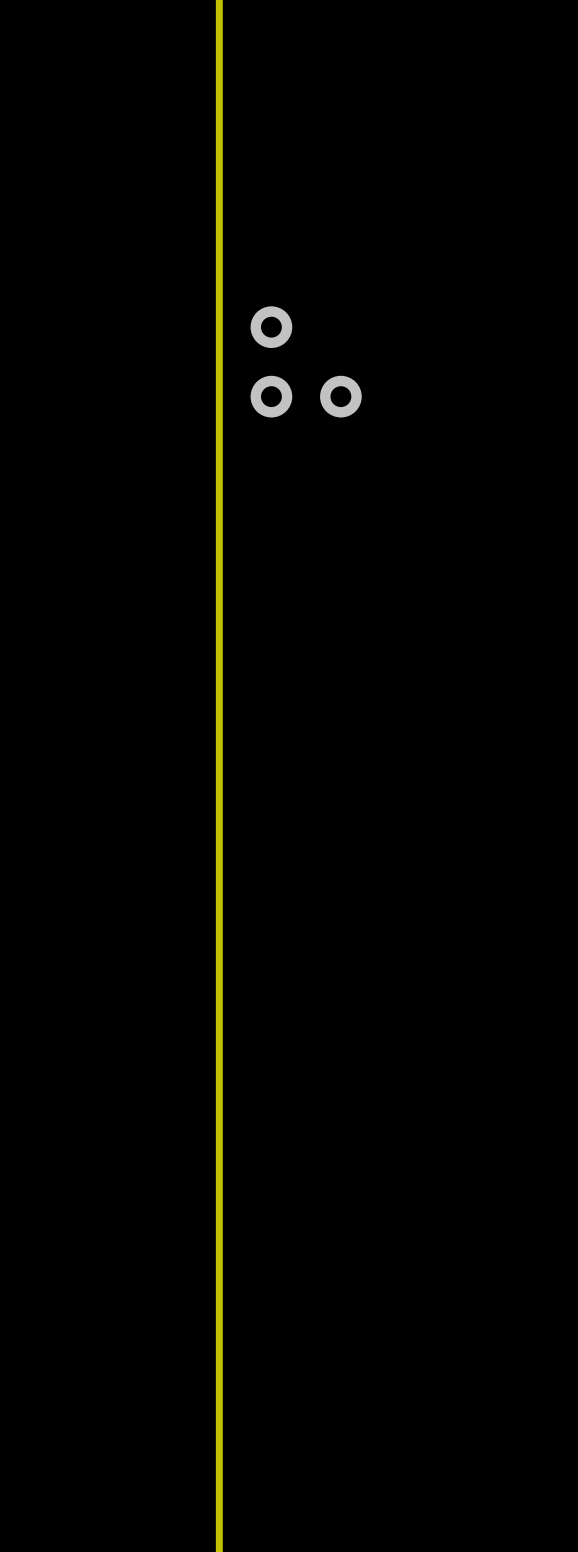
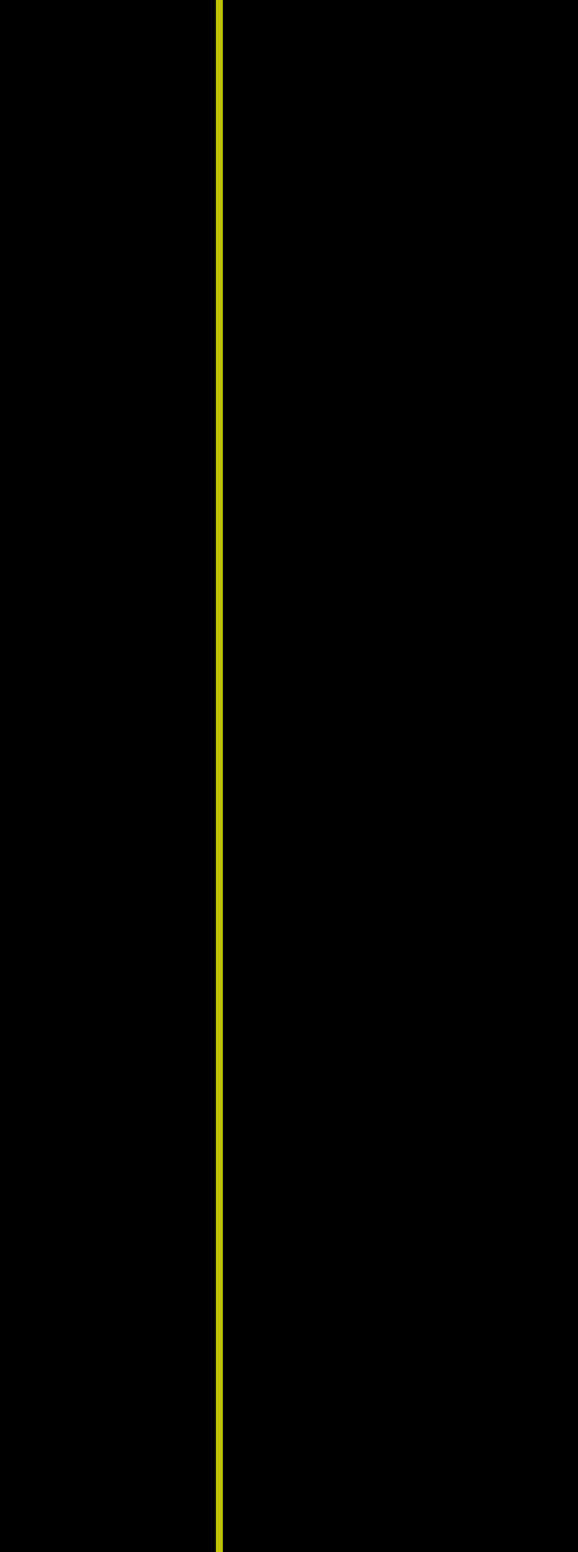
via: (271, 327) -> none
via: (271, 396) -> none
via: (340, 396) -> none

